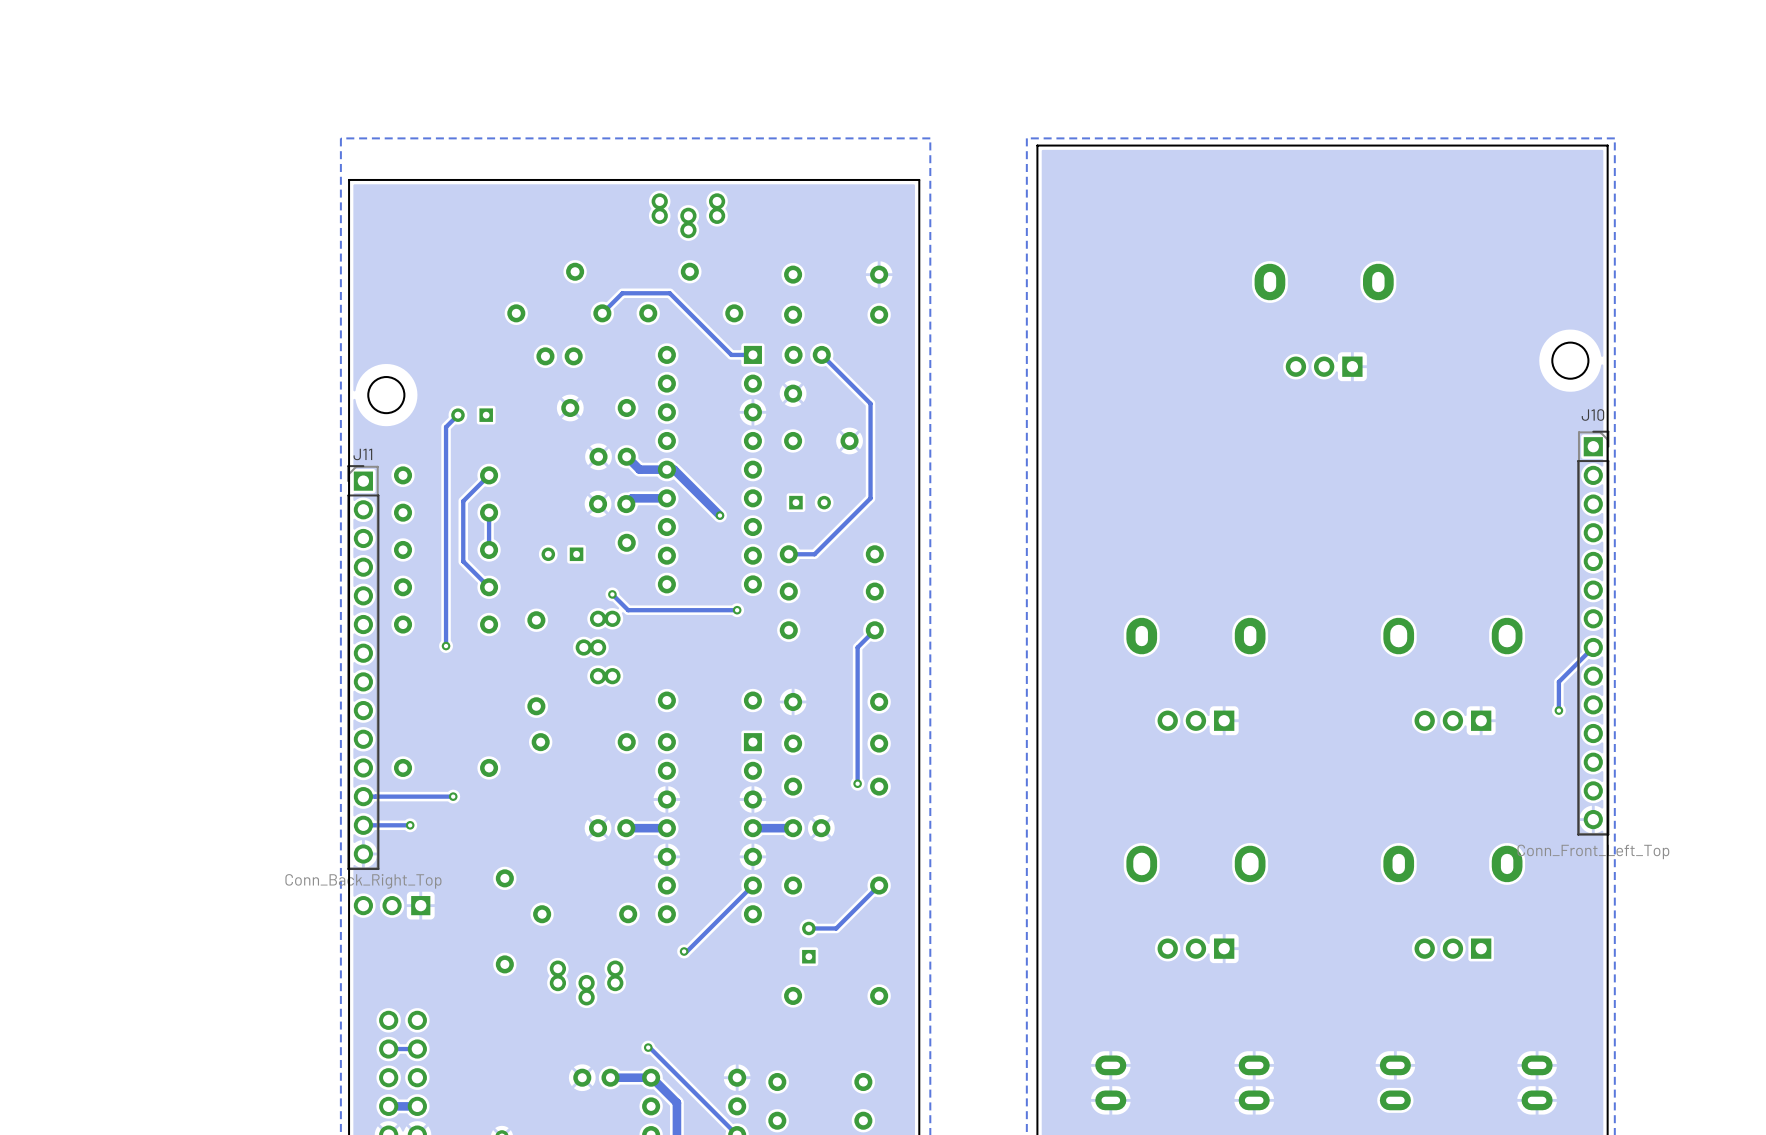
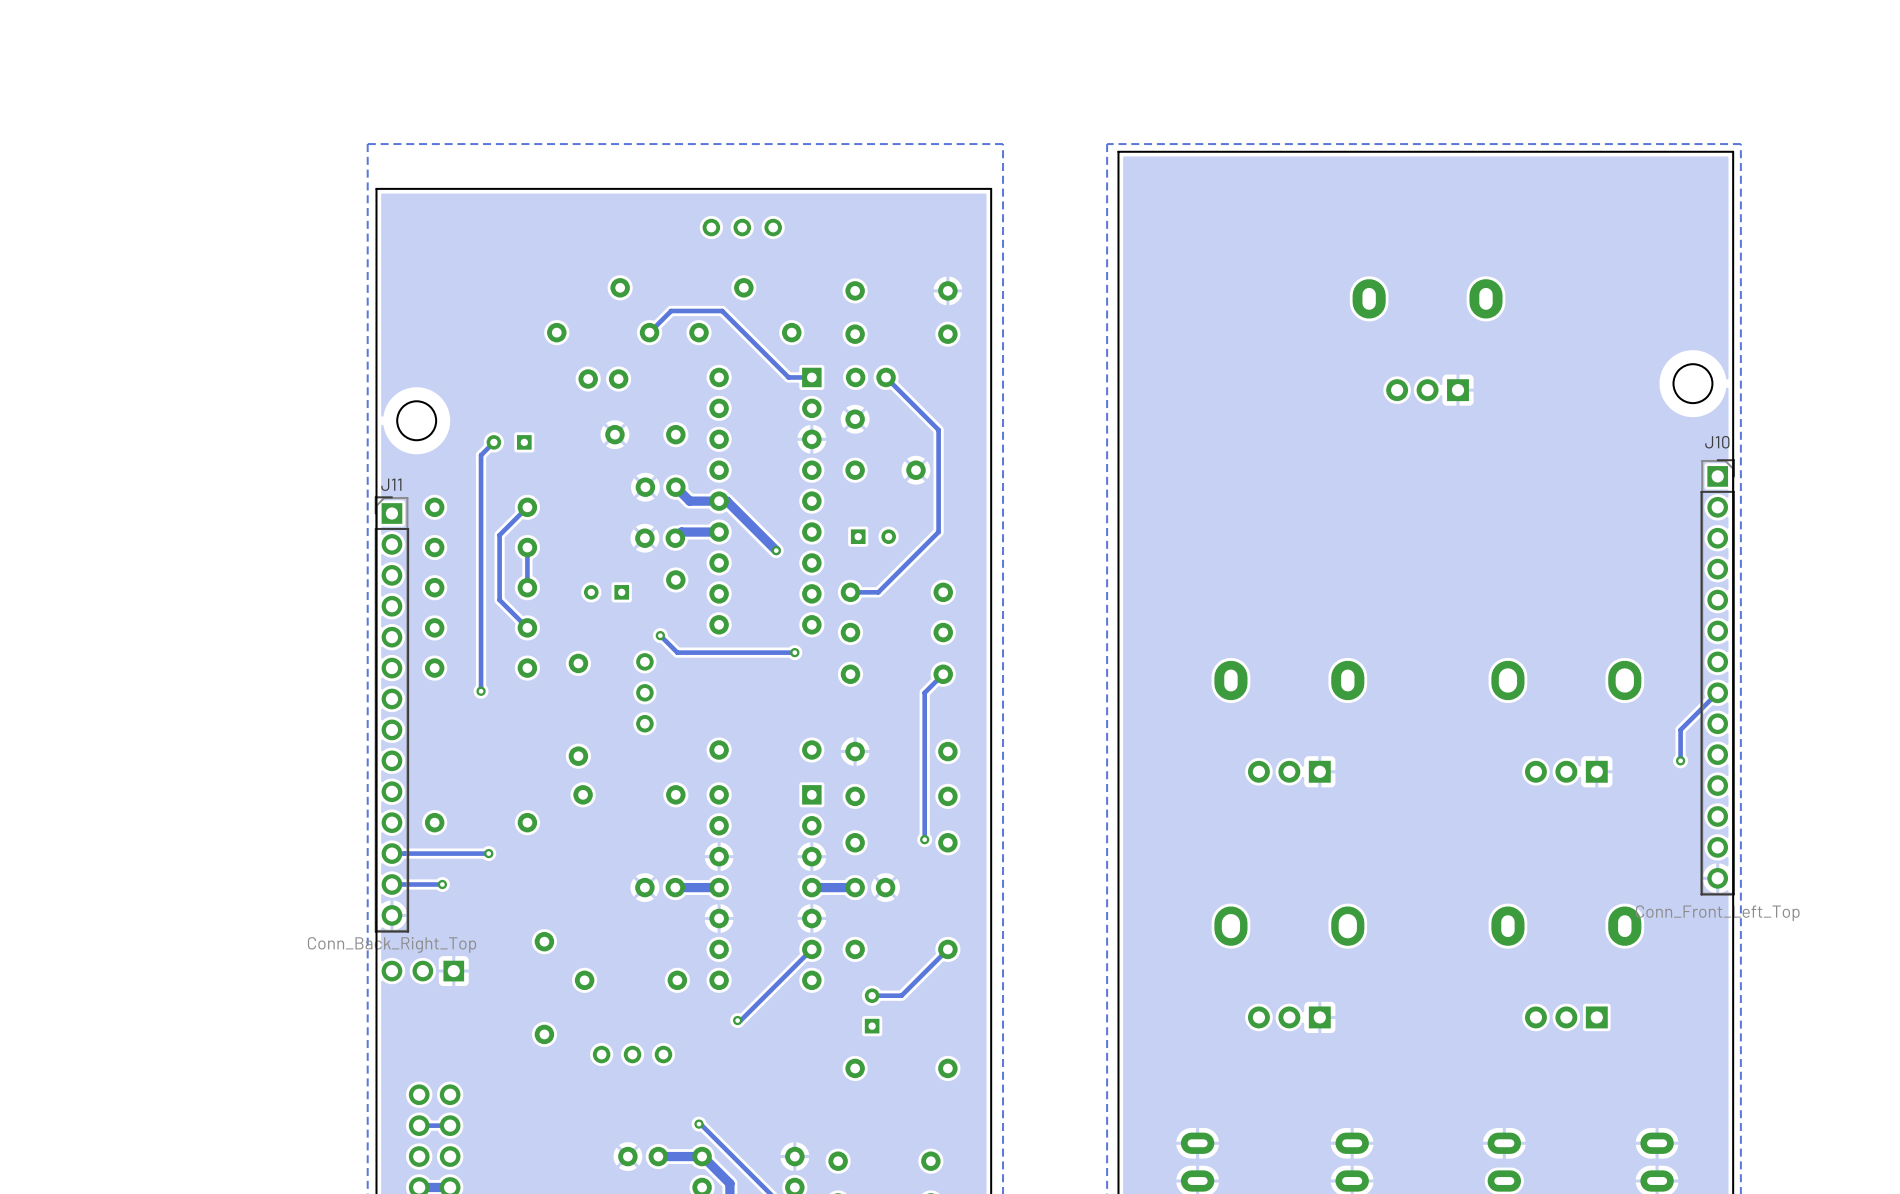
part footprint: [651, 193, 726, 239] -> [702, 218, 782, 237]
part footprint: [575, 610, 621, 685] -> [636, 653, 654, 733]
part footprint: [549, 960, 624, 1006] -> [592, 1045, 673, 1064]

